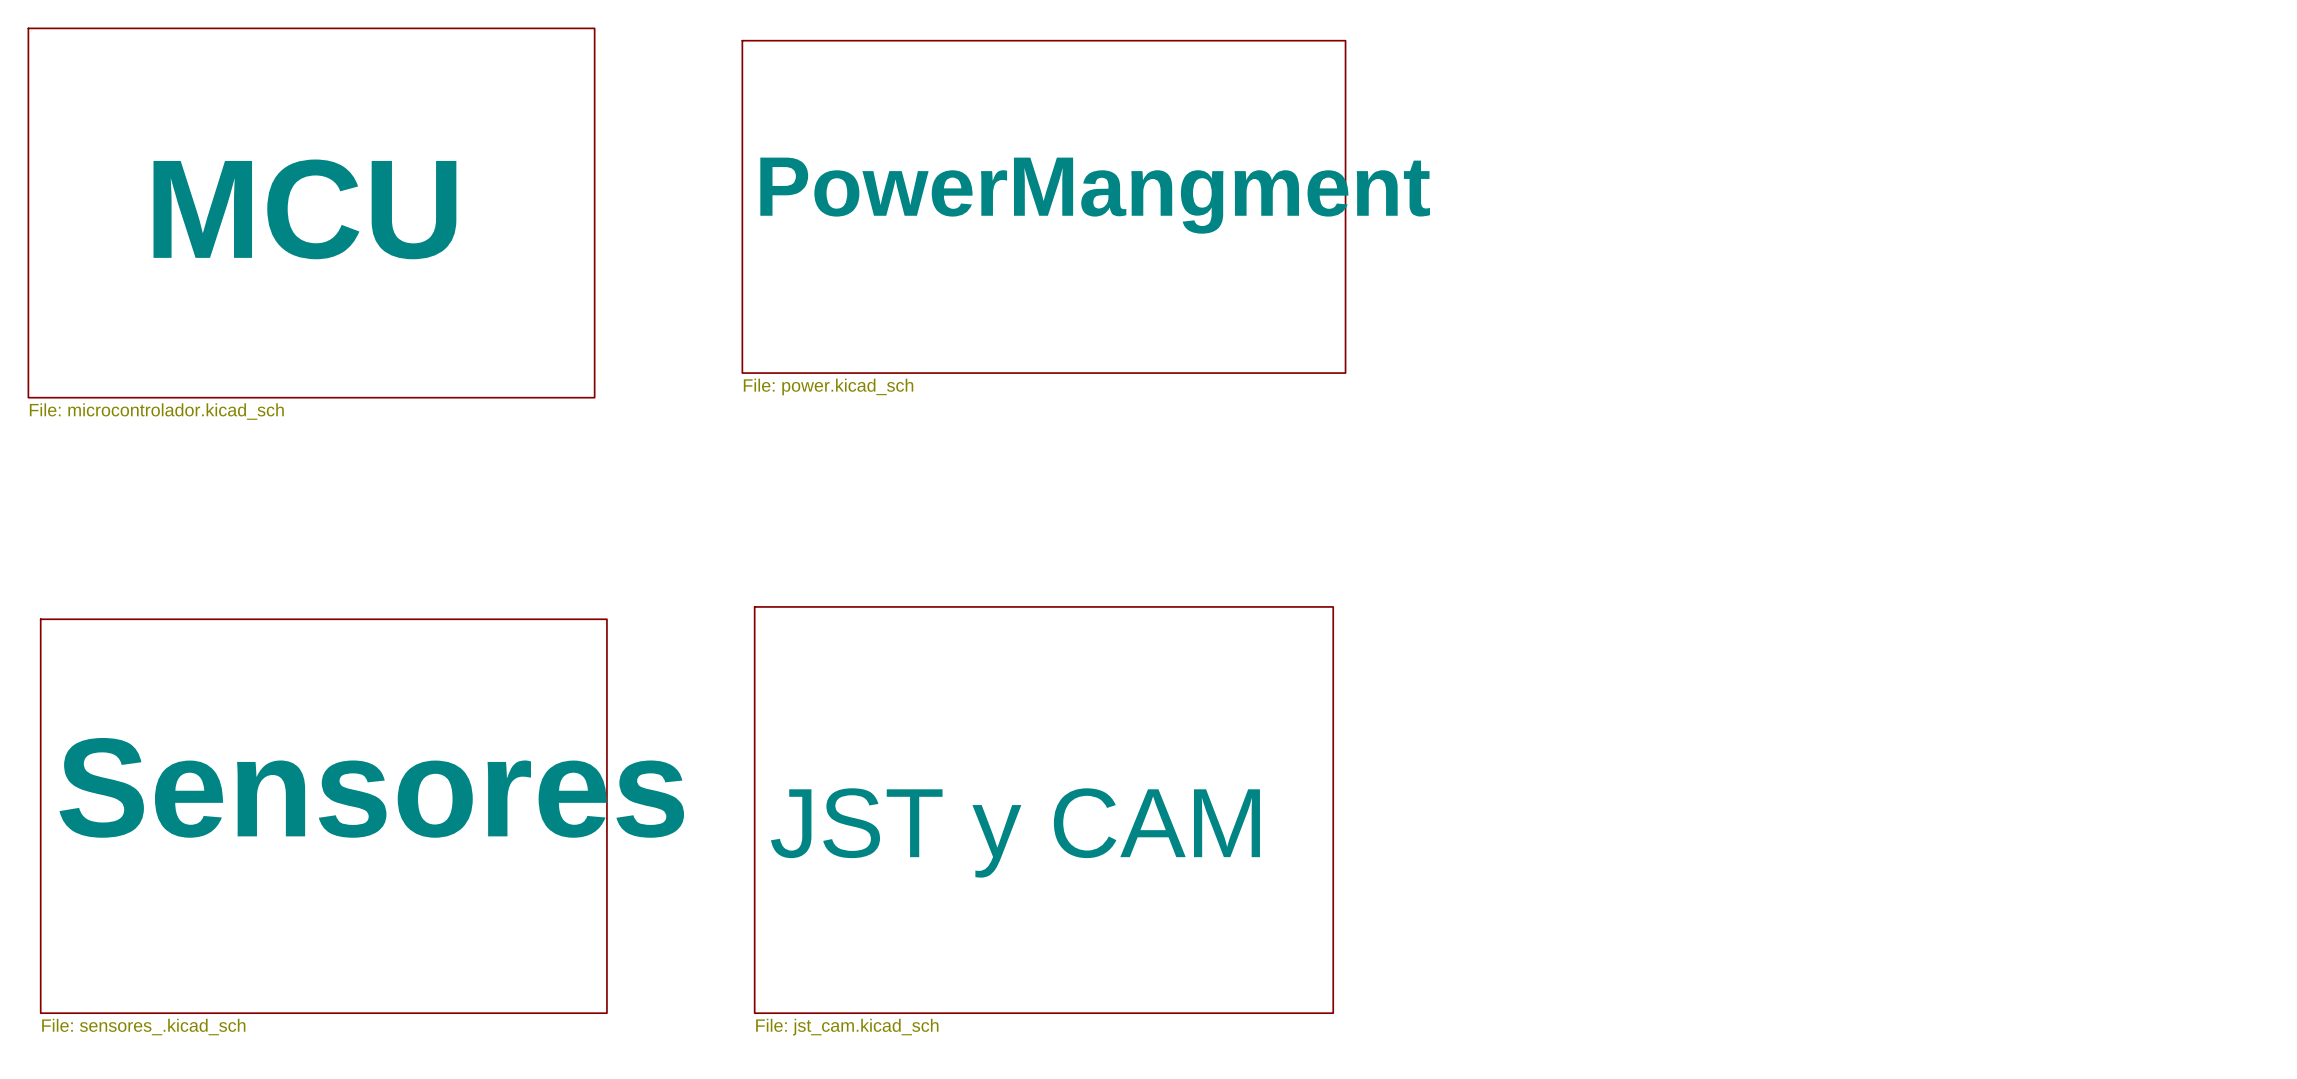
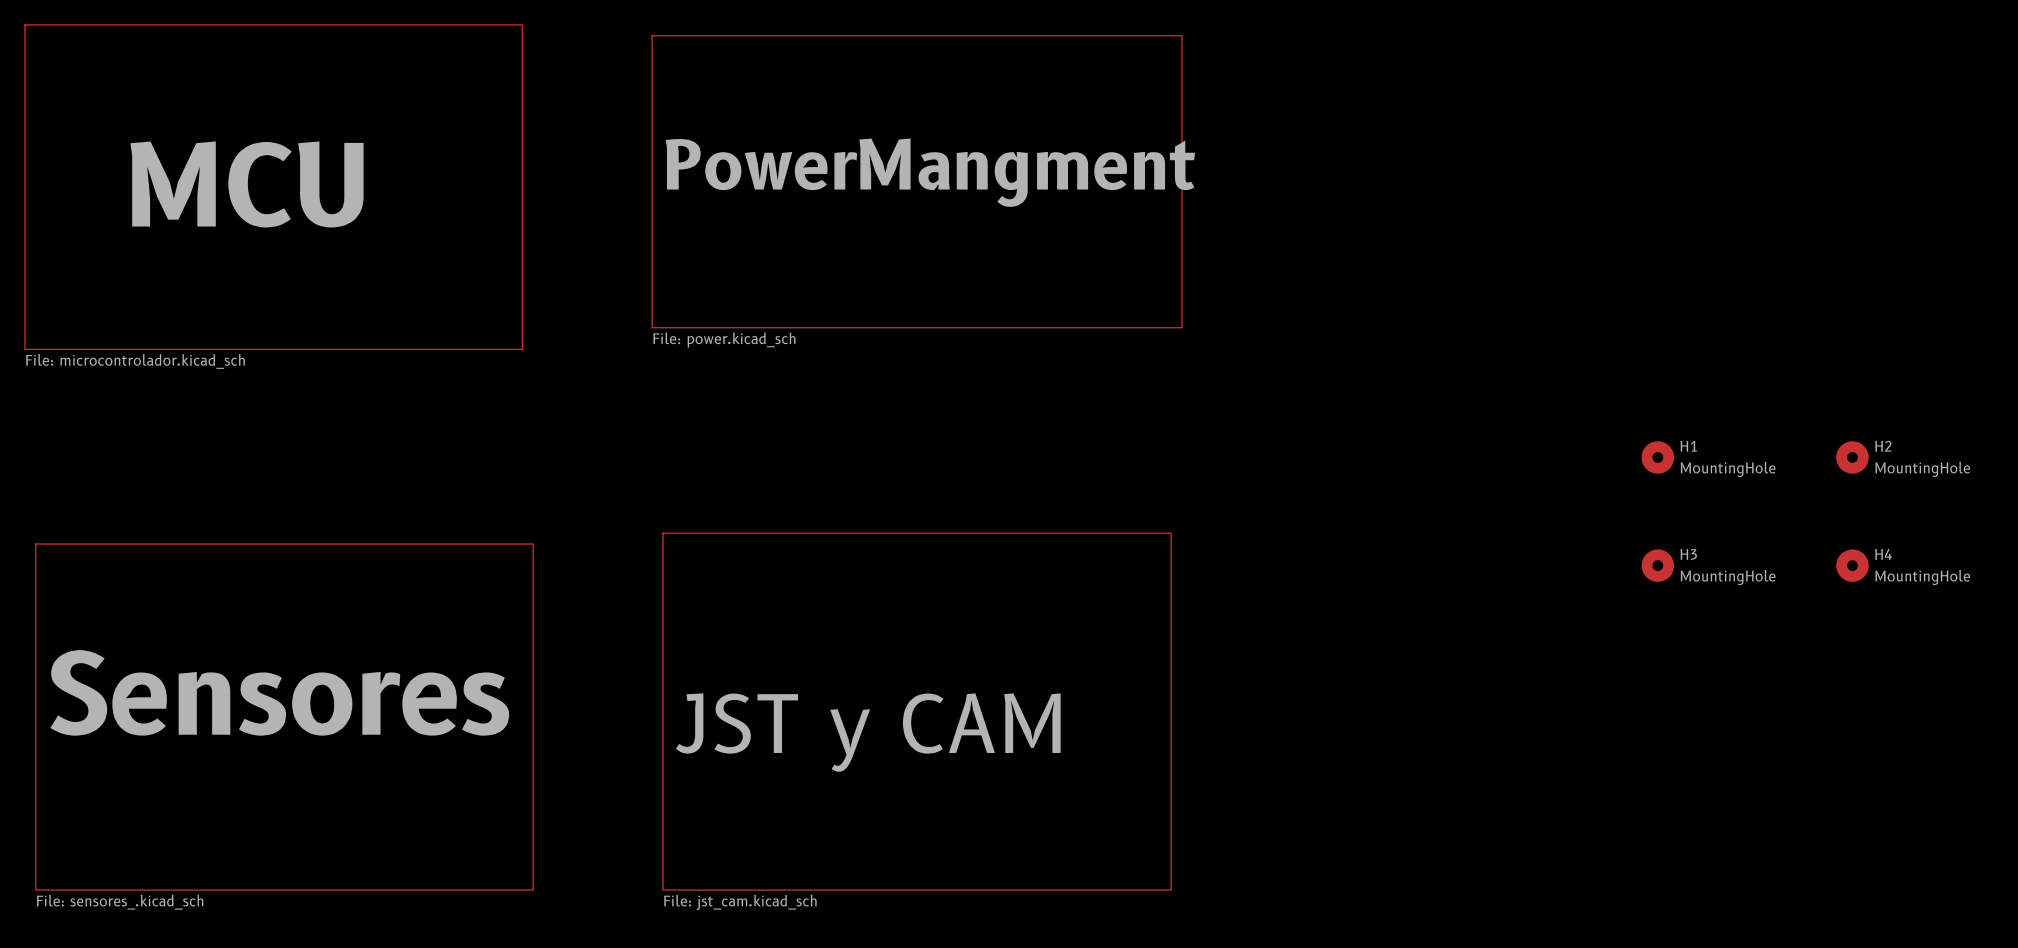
H1: none -> MountingHole (1657, 457)
H2: none -> MountingHole (1852, 457)
H3: none -> MountingHole (1657, 565)
H4: none -> MountingHole (1852, 565)

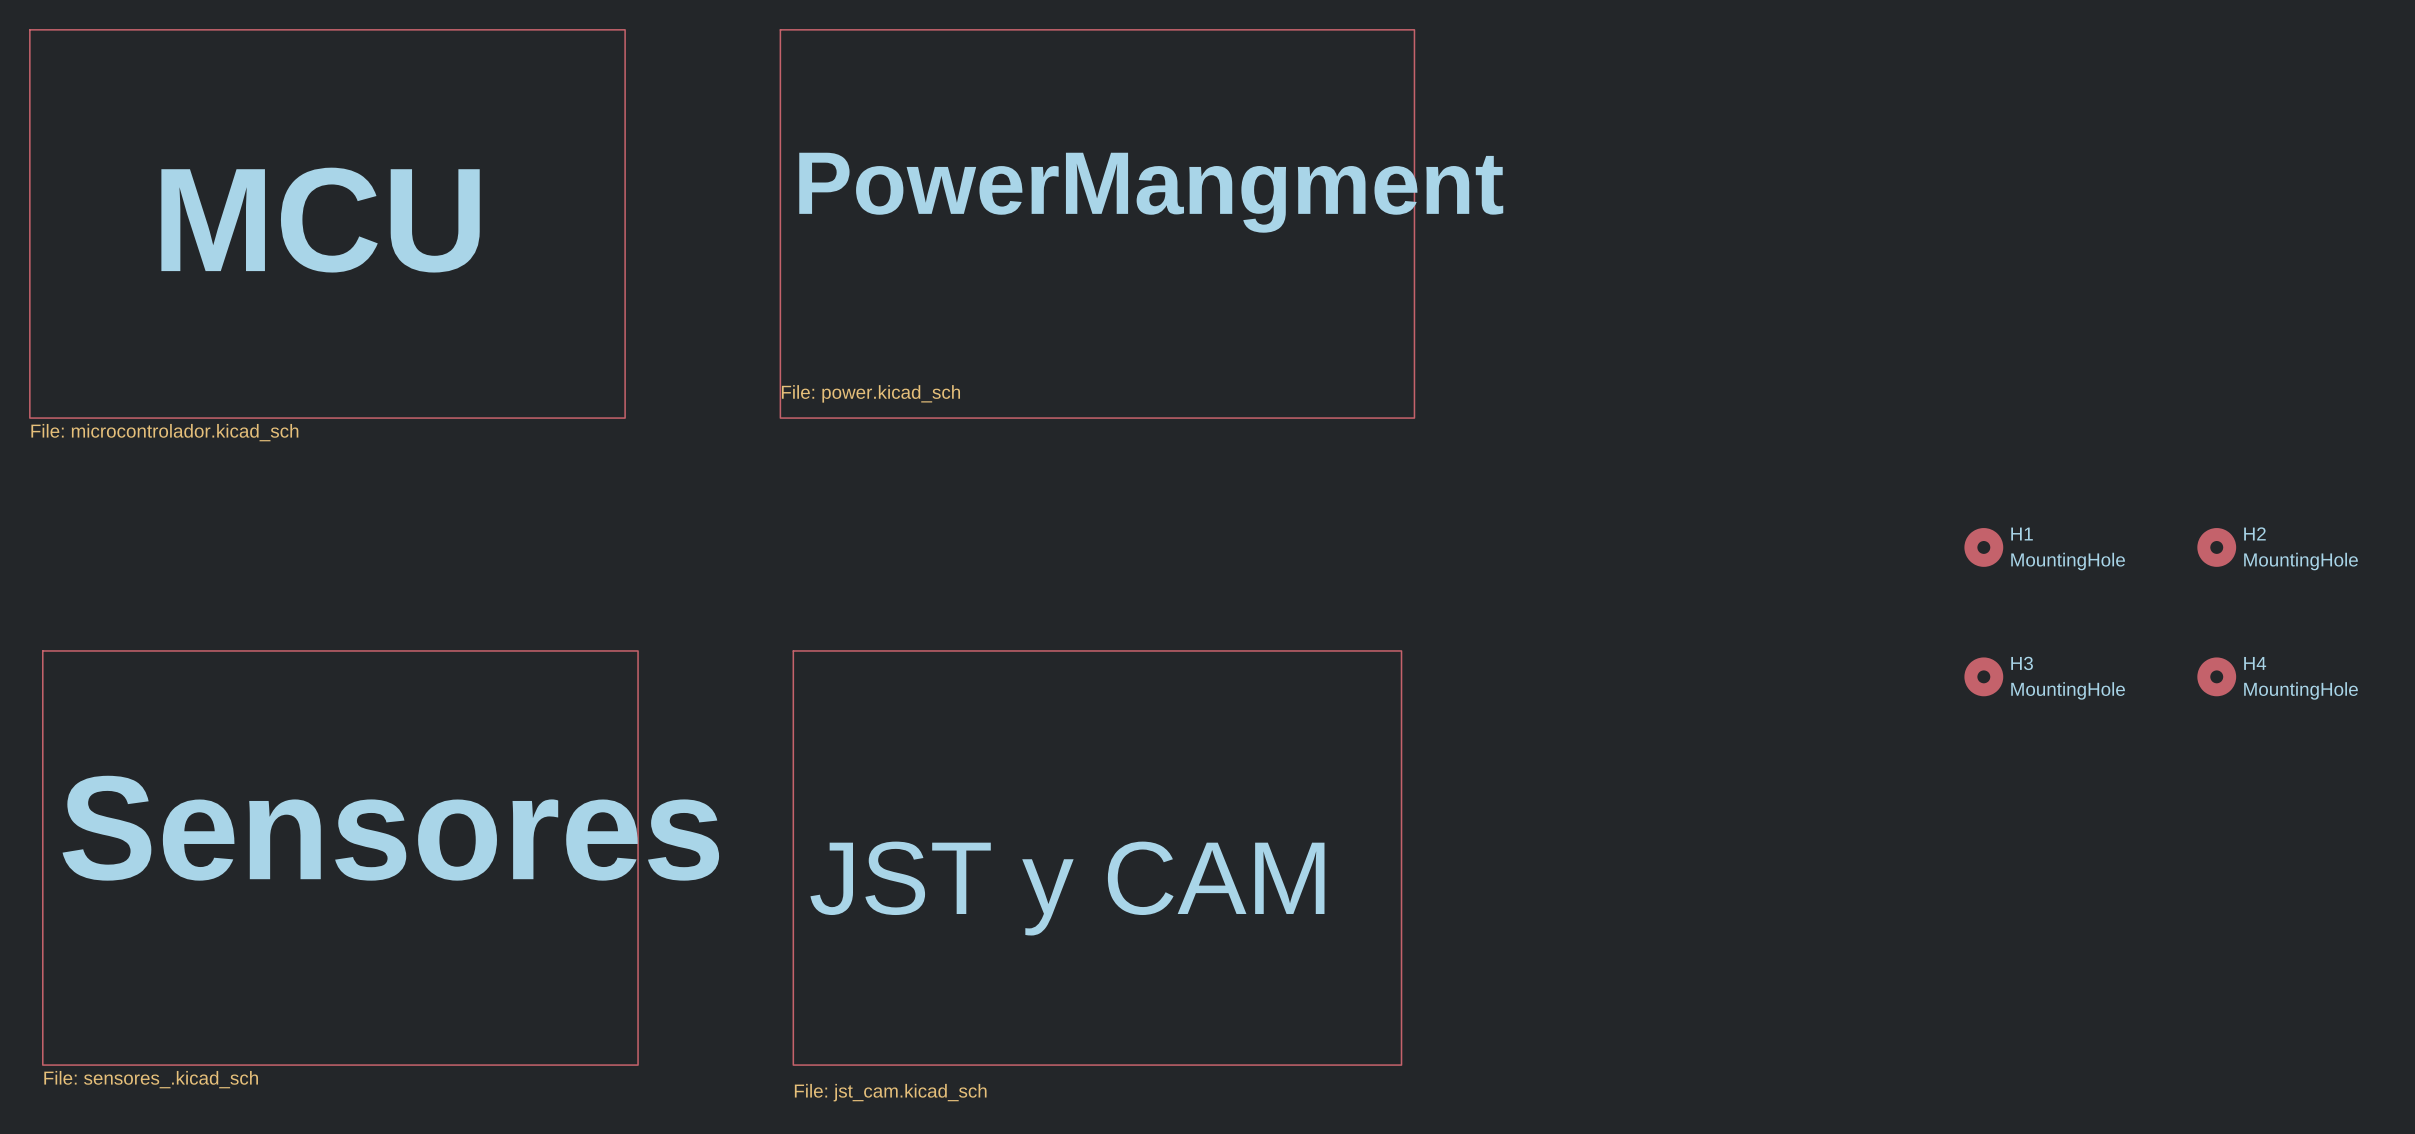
sheet PowerMangment shape: [651, 35, 1183, 329] -> [779, 29, 1416, 419]
sheet JST y CAM shape: [662, 532, 1172, 891] -> [792, 650, 1403, 1066]

